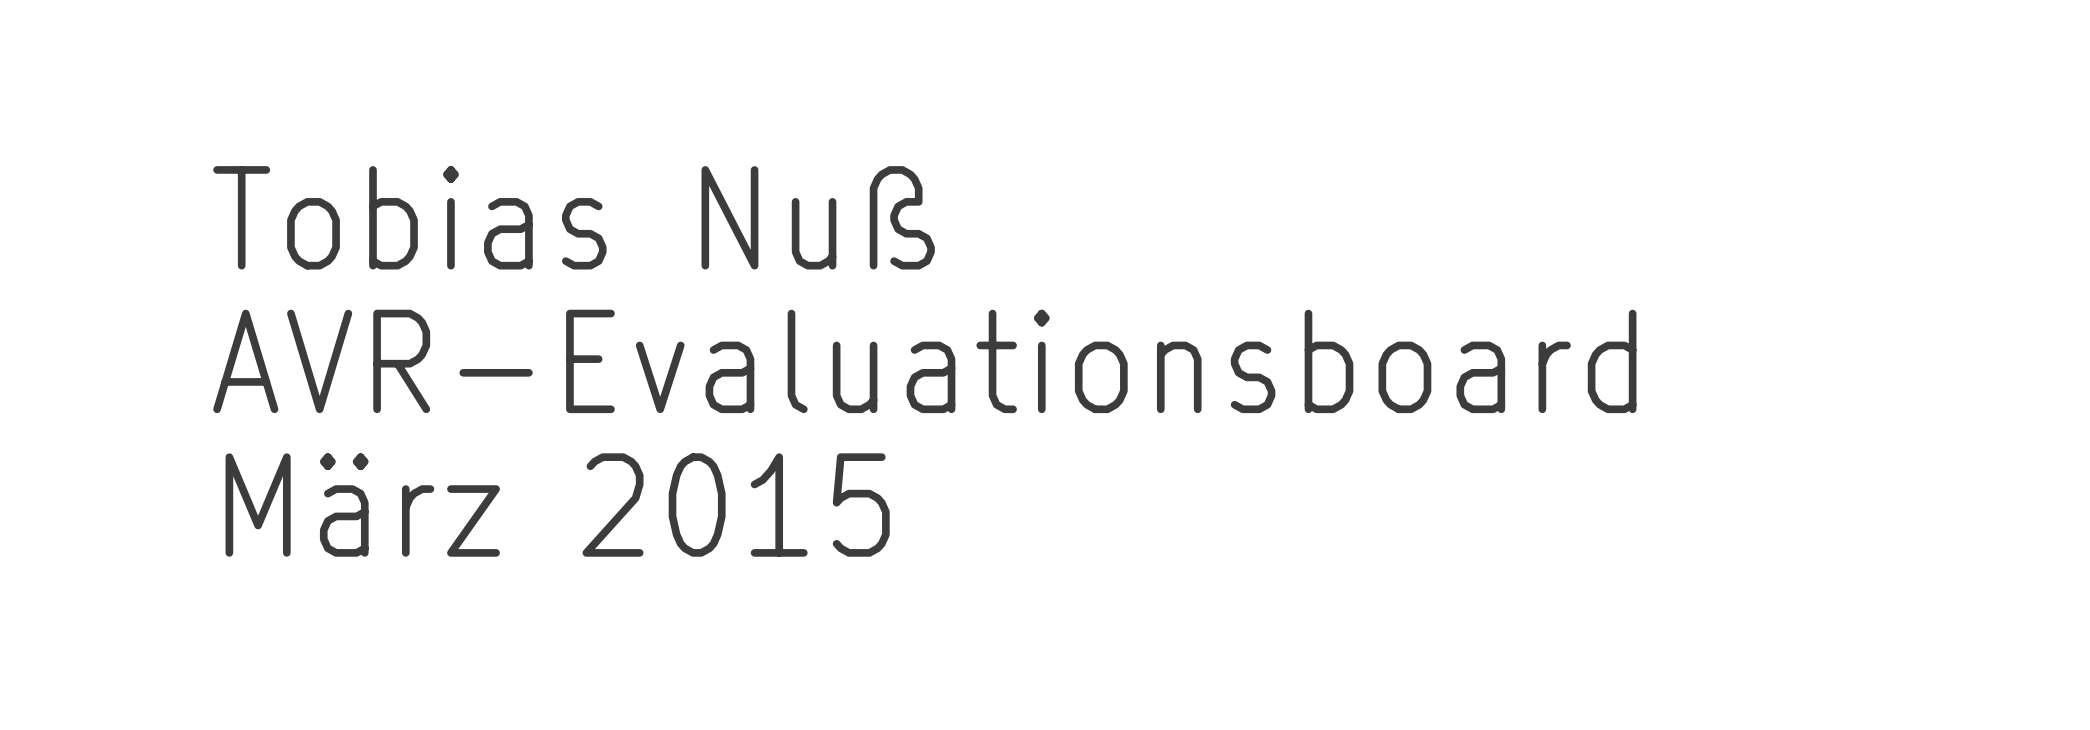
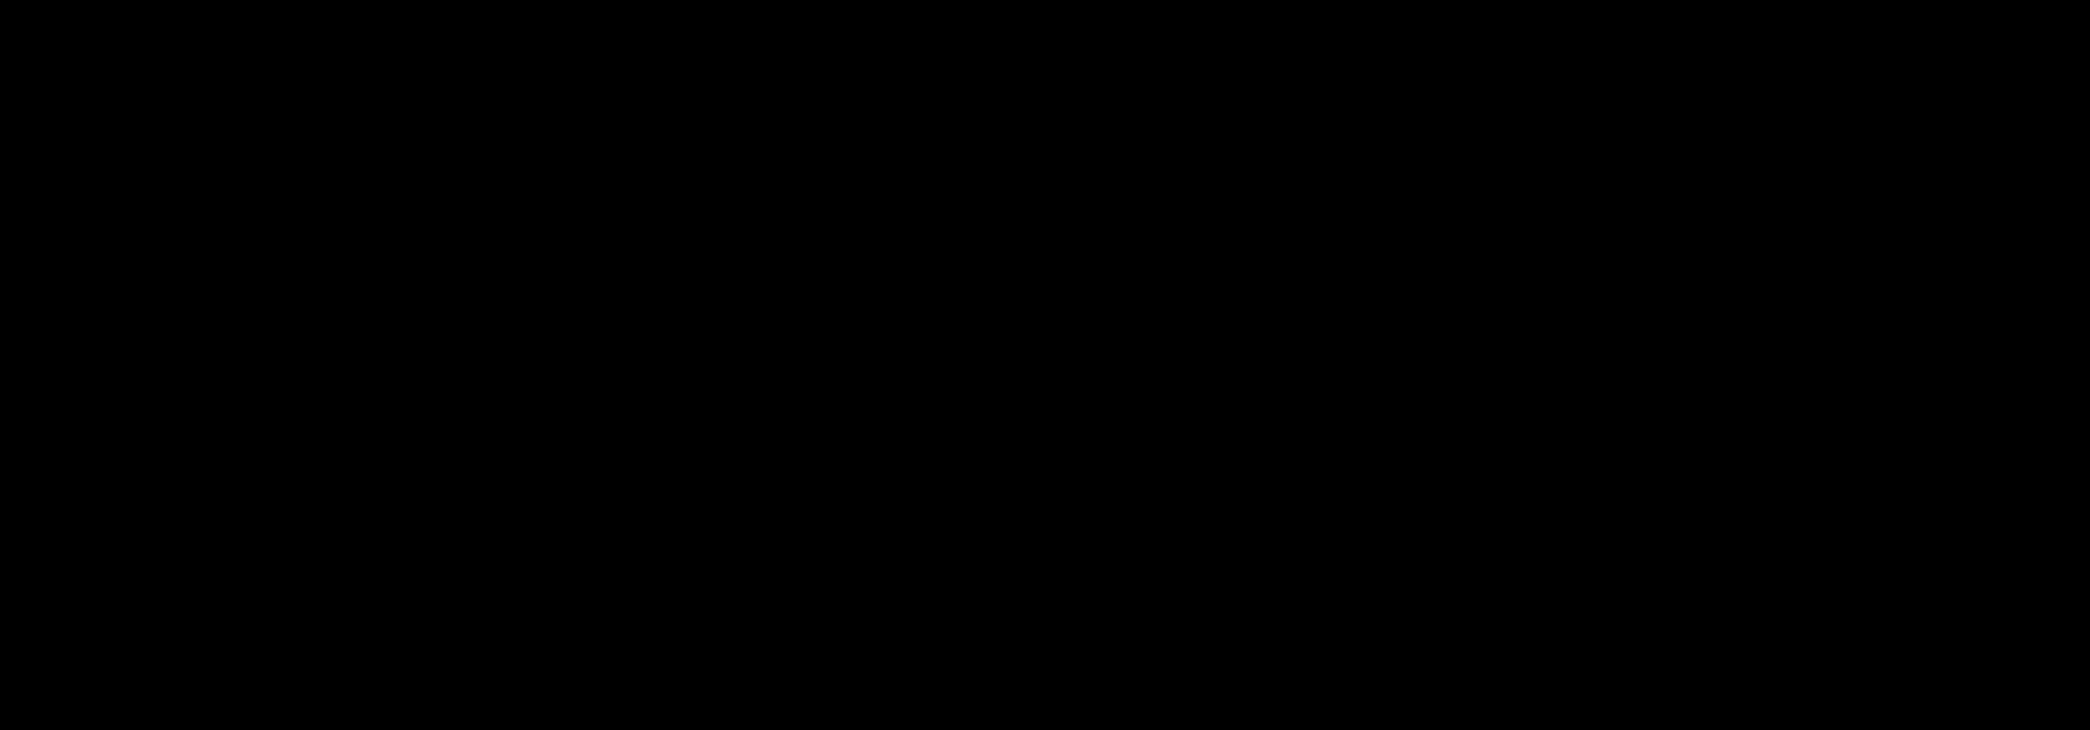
text: Tobias Nuß (574, 217) -> none
text: AVR-Evaluationsboard (924, 361) -> none
text: März 2015 (557, 505) -> none

